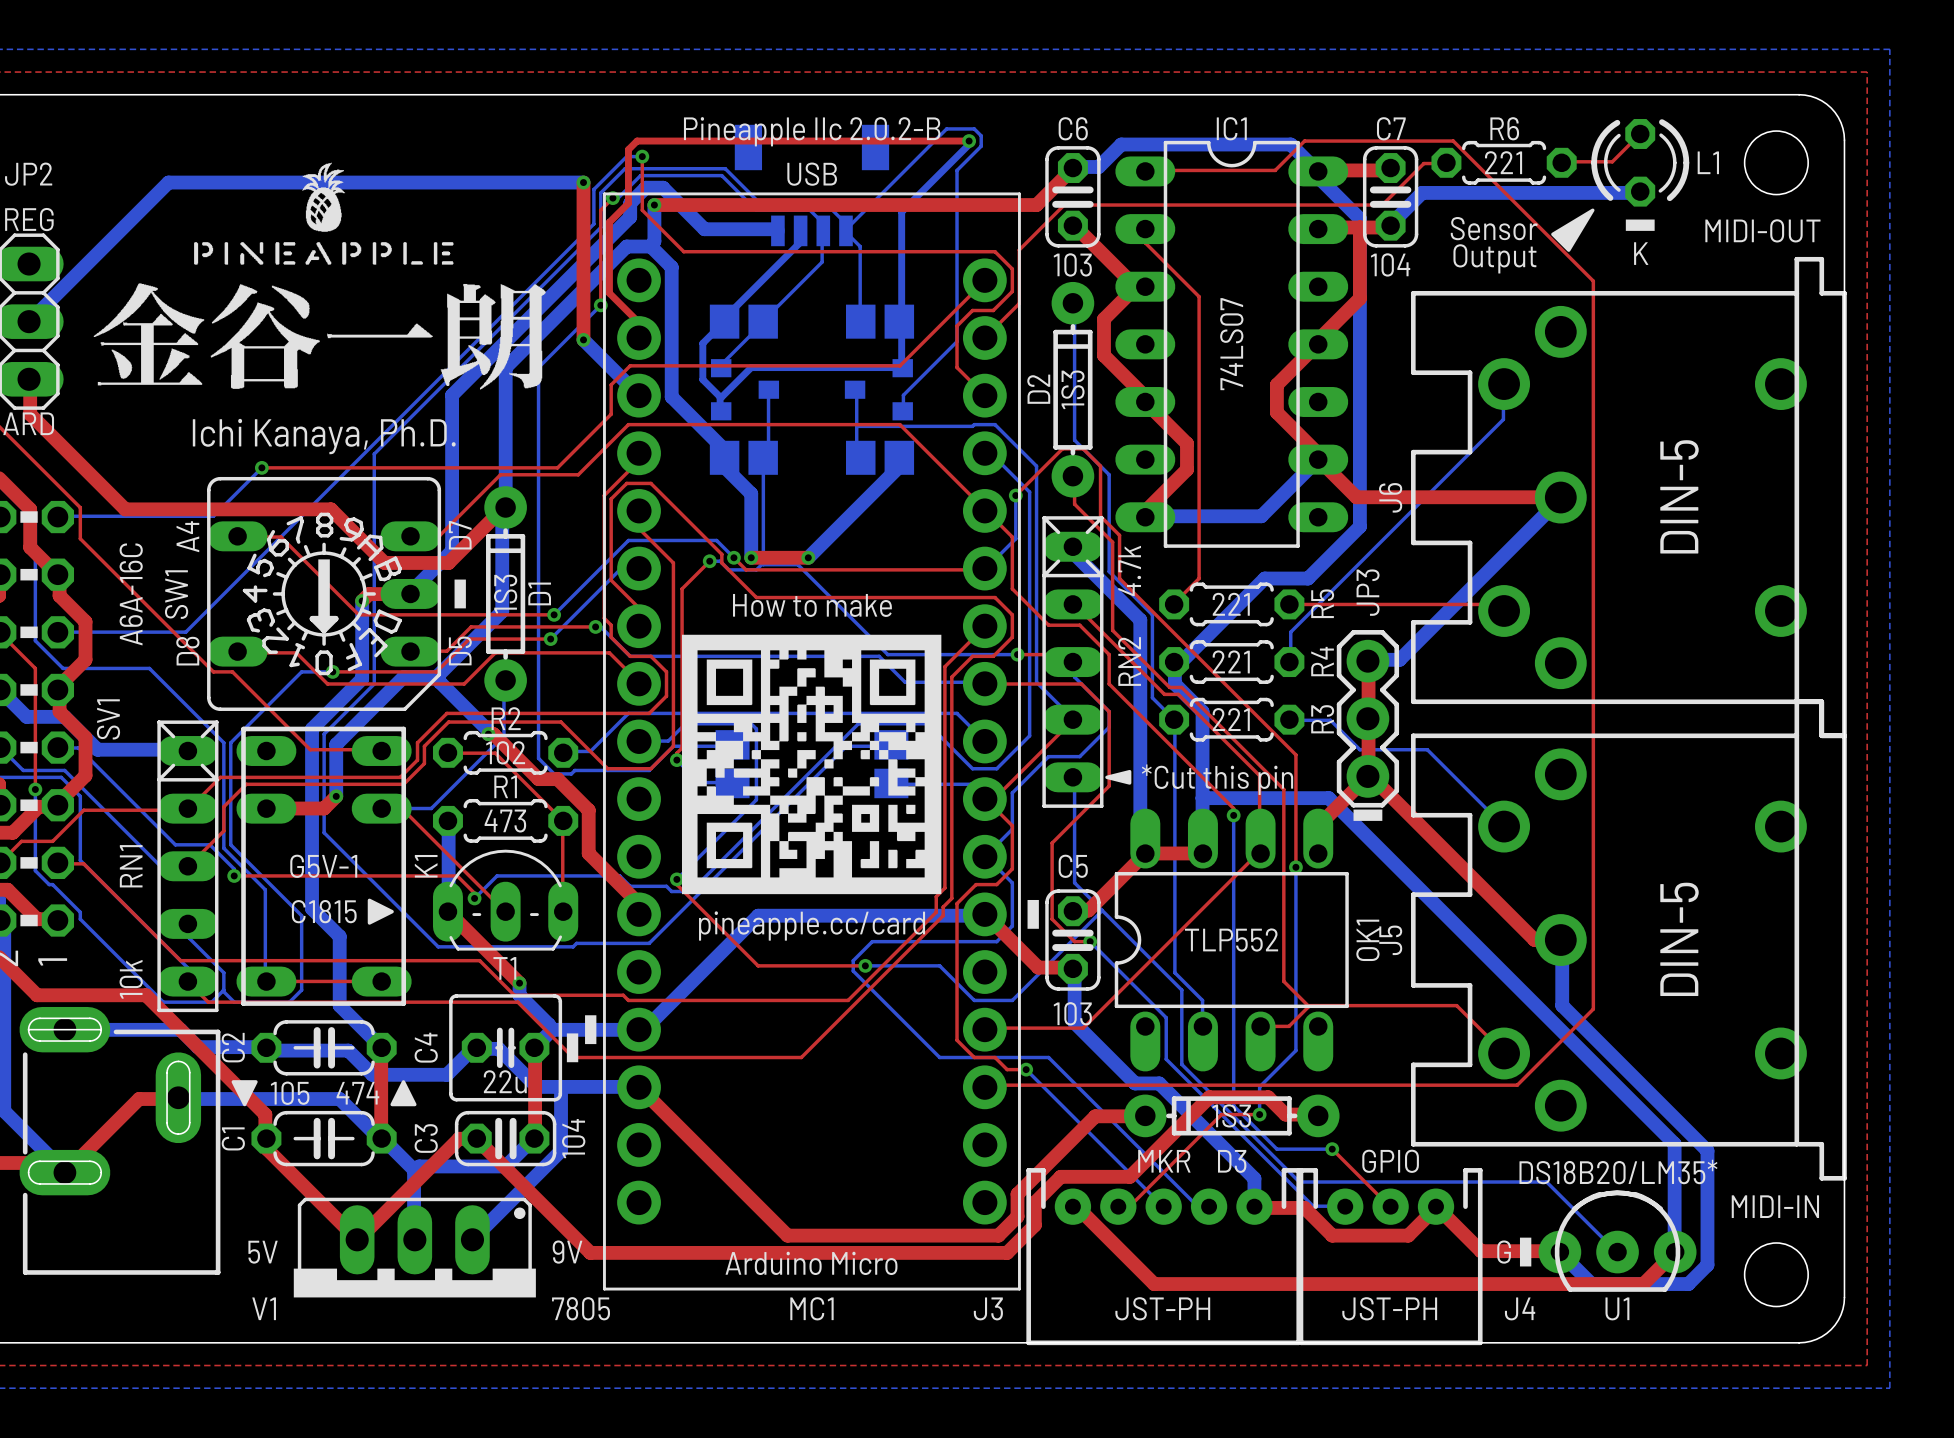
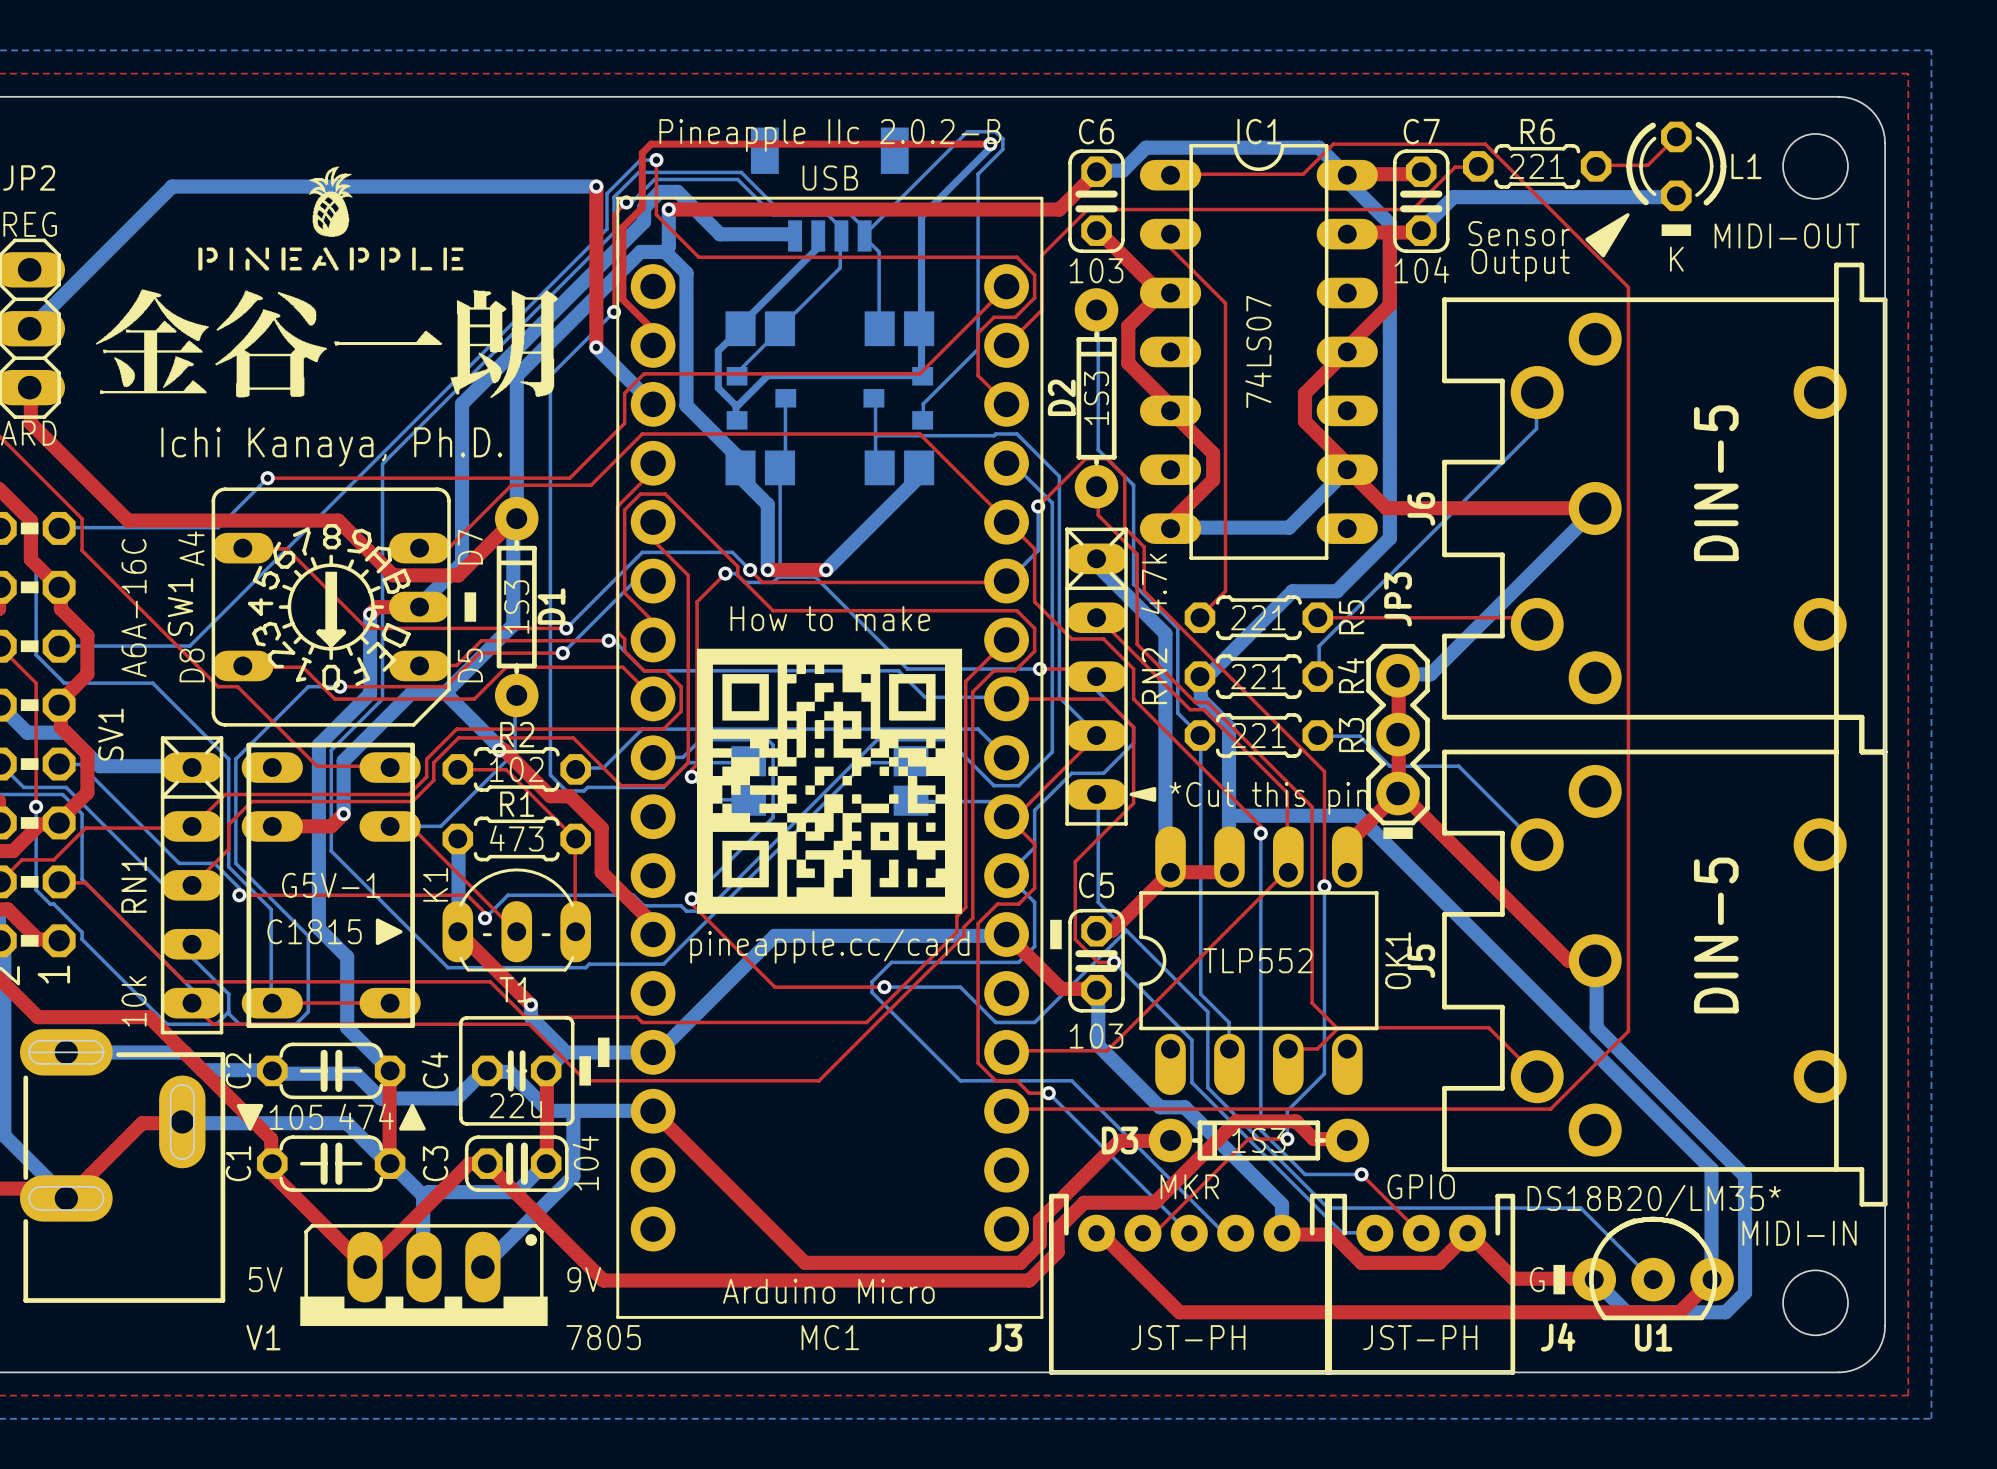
D3 name position: D3 (1232, 1161) -> D3 (1120, 1140)

